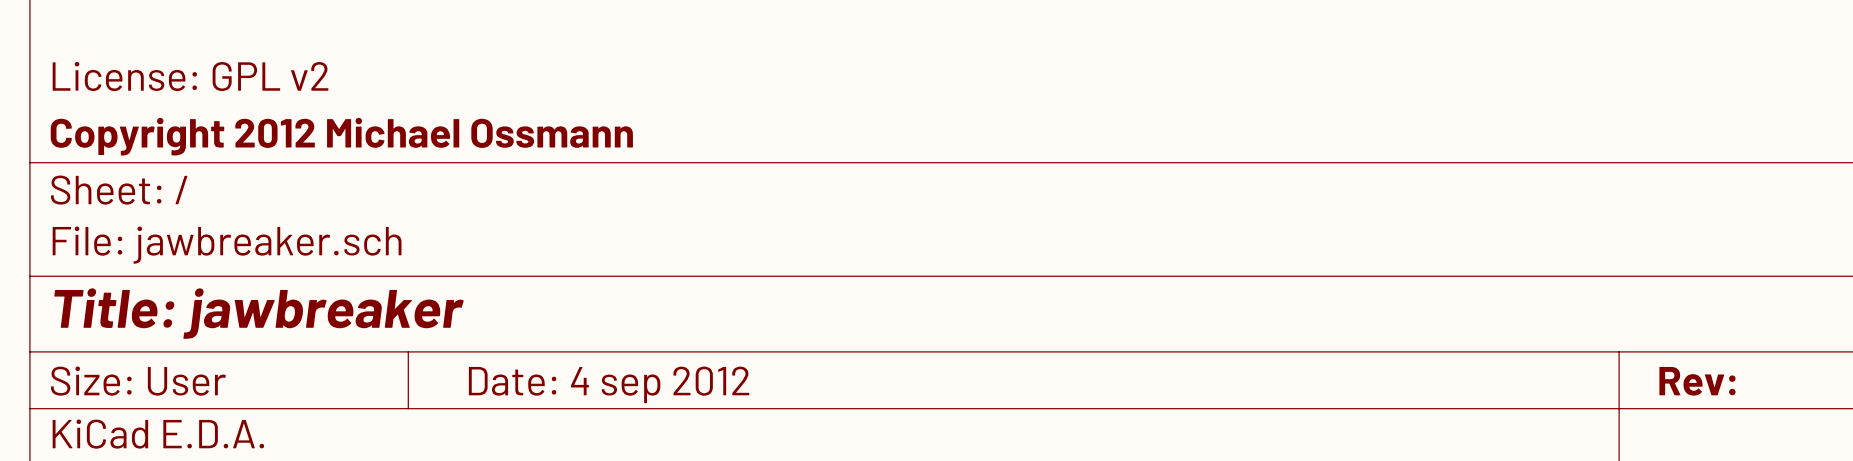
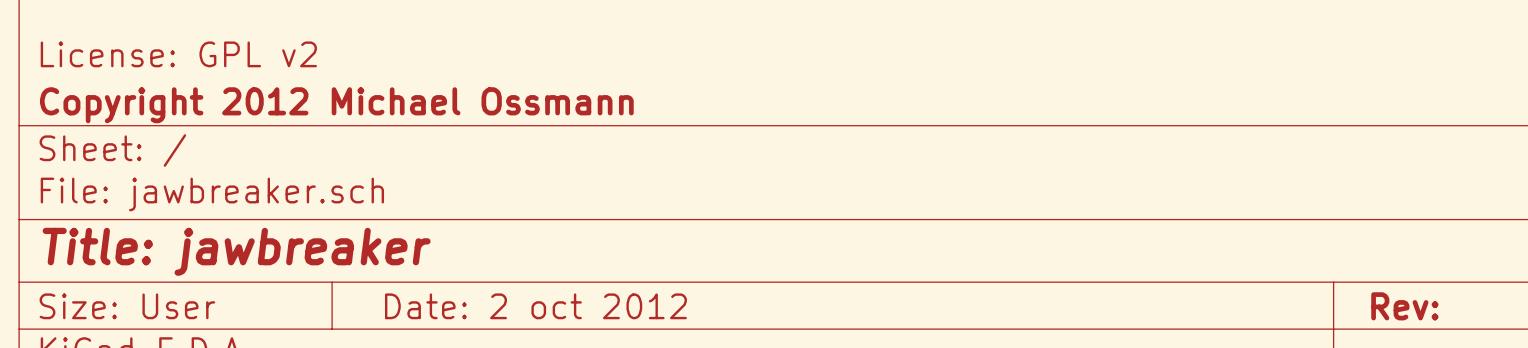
title block: Date: 4 sep 2012 (609, 384) -> Date: 2 oct 2012 (535, 306)

